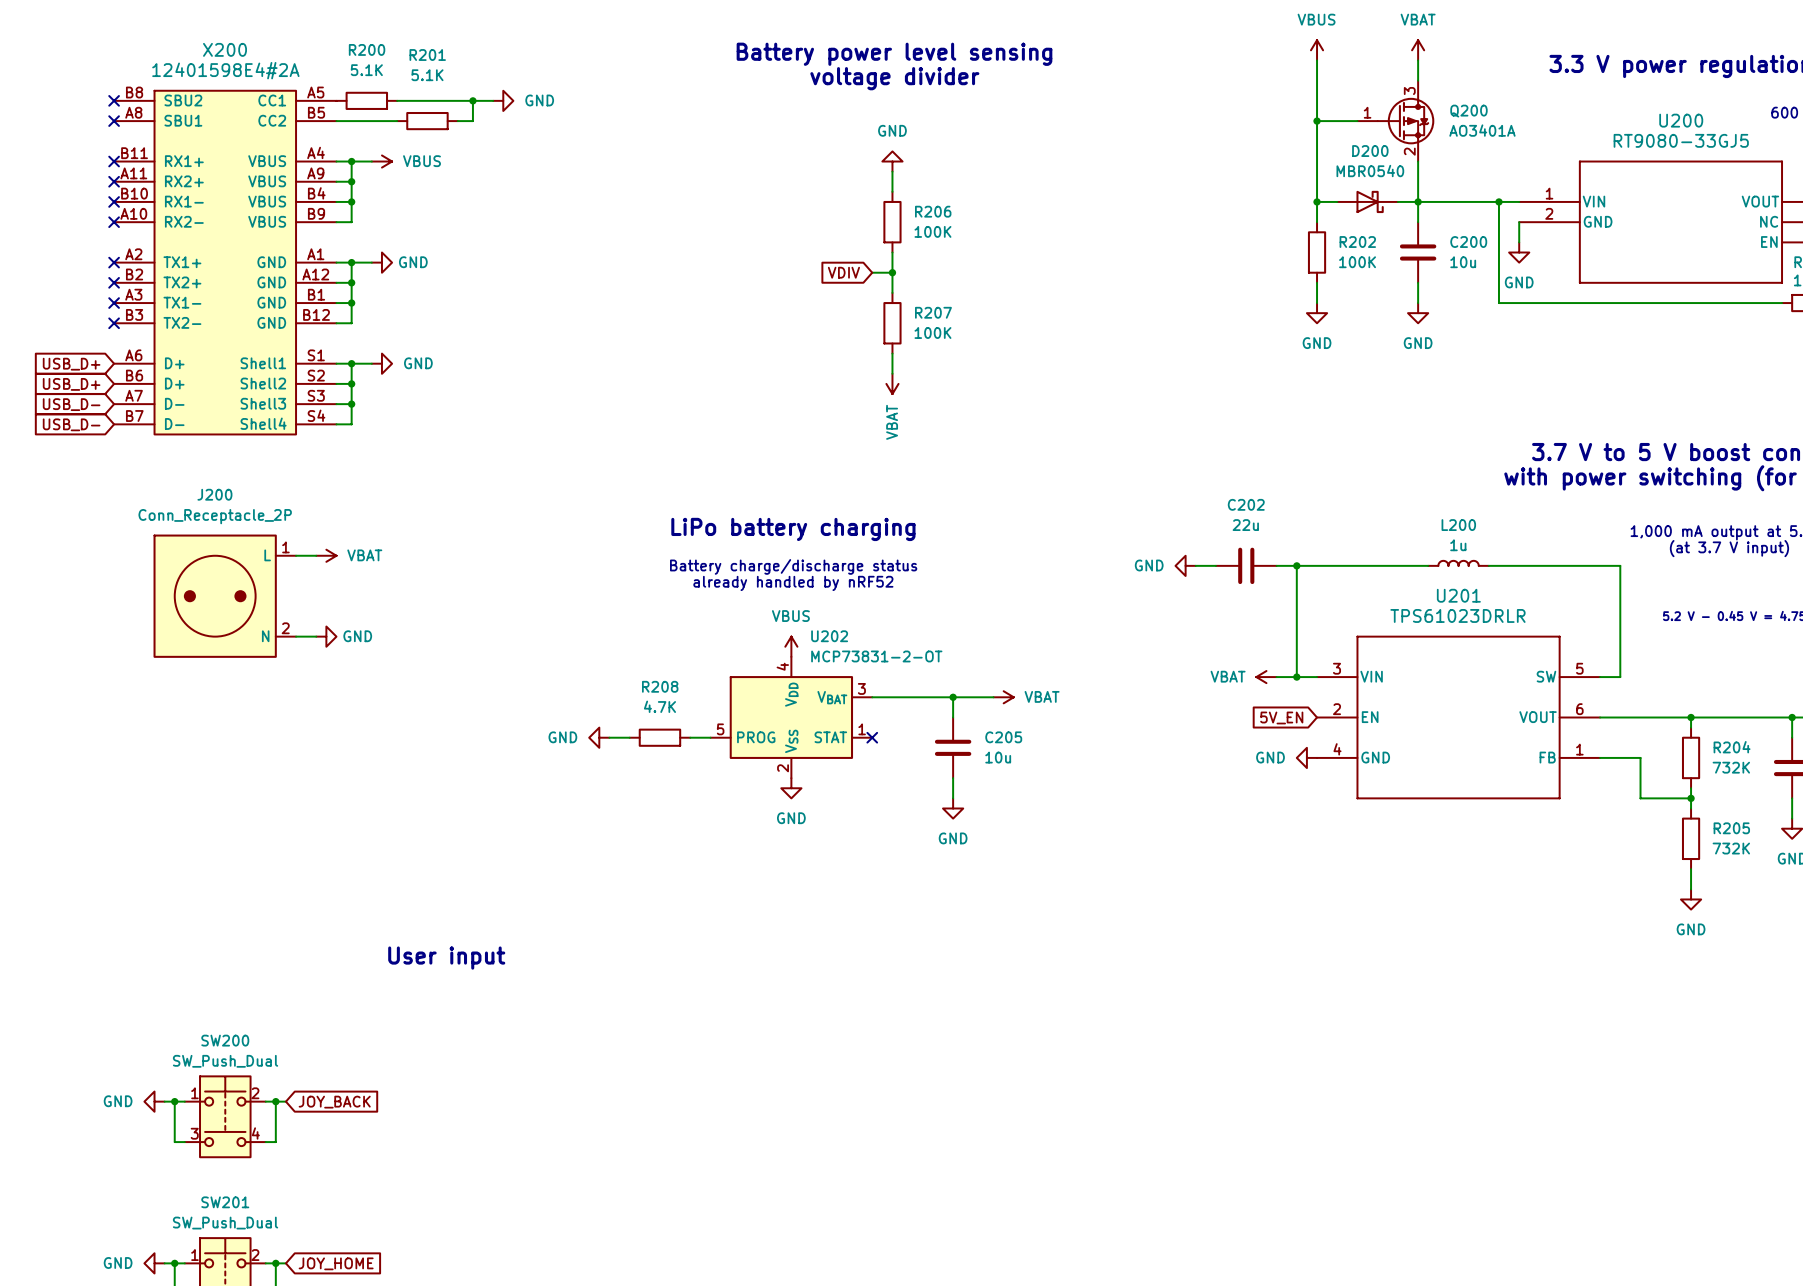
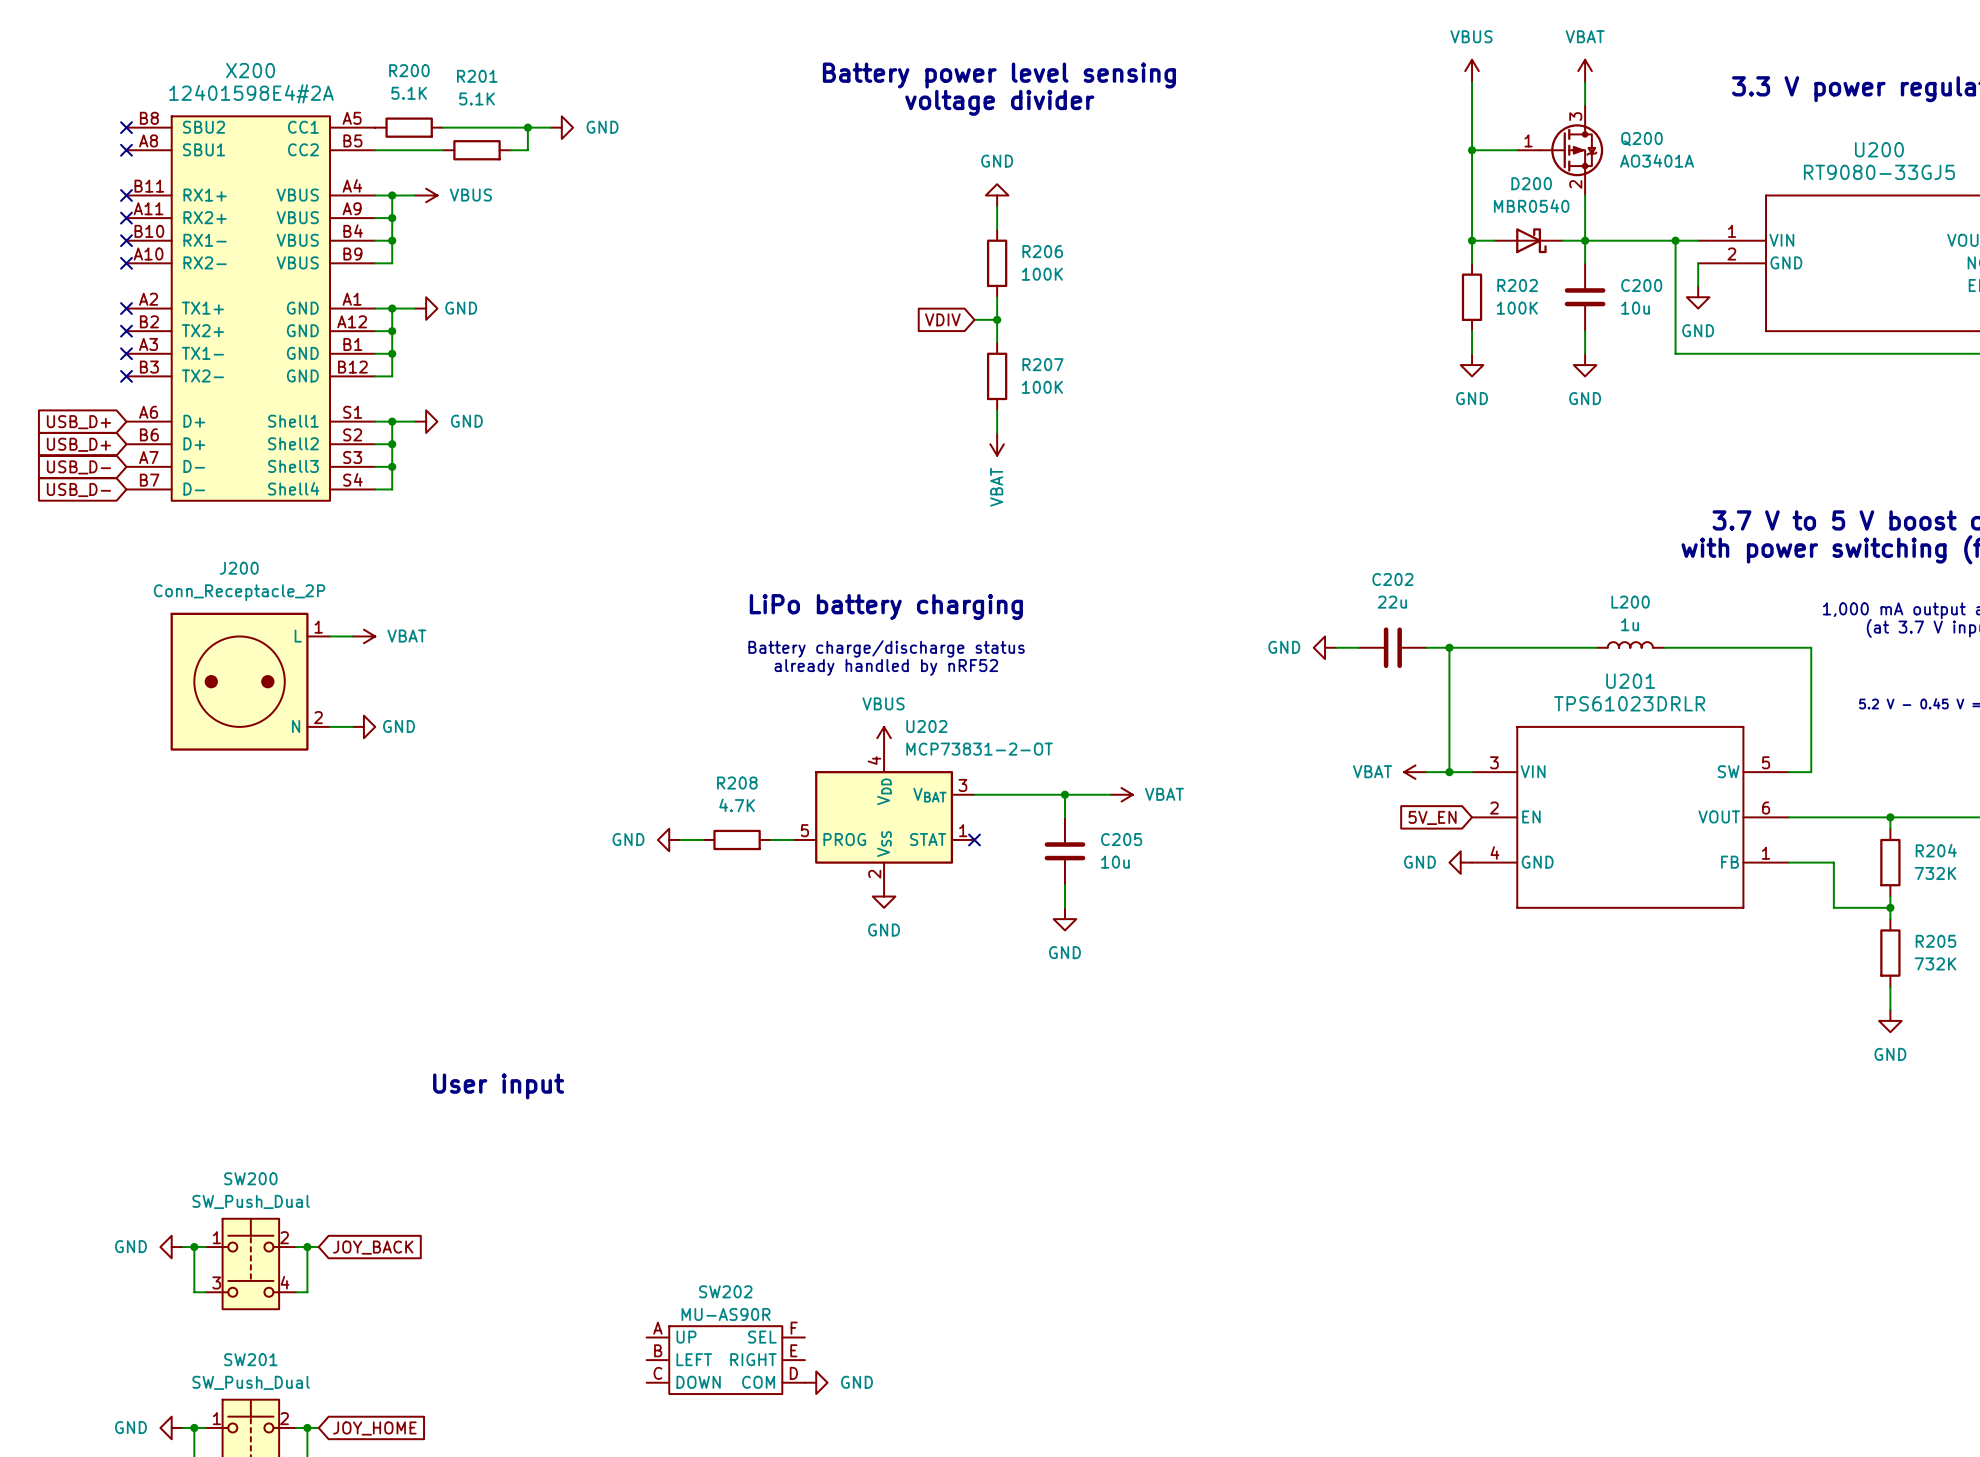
SW202: none -> MU-AS90R (725, 1360)
power symbol: none -> GND (816, 1382)

